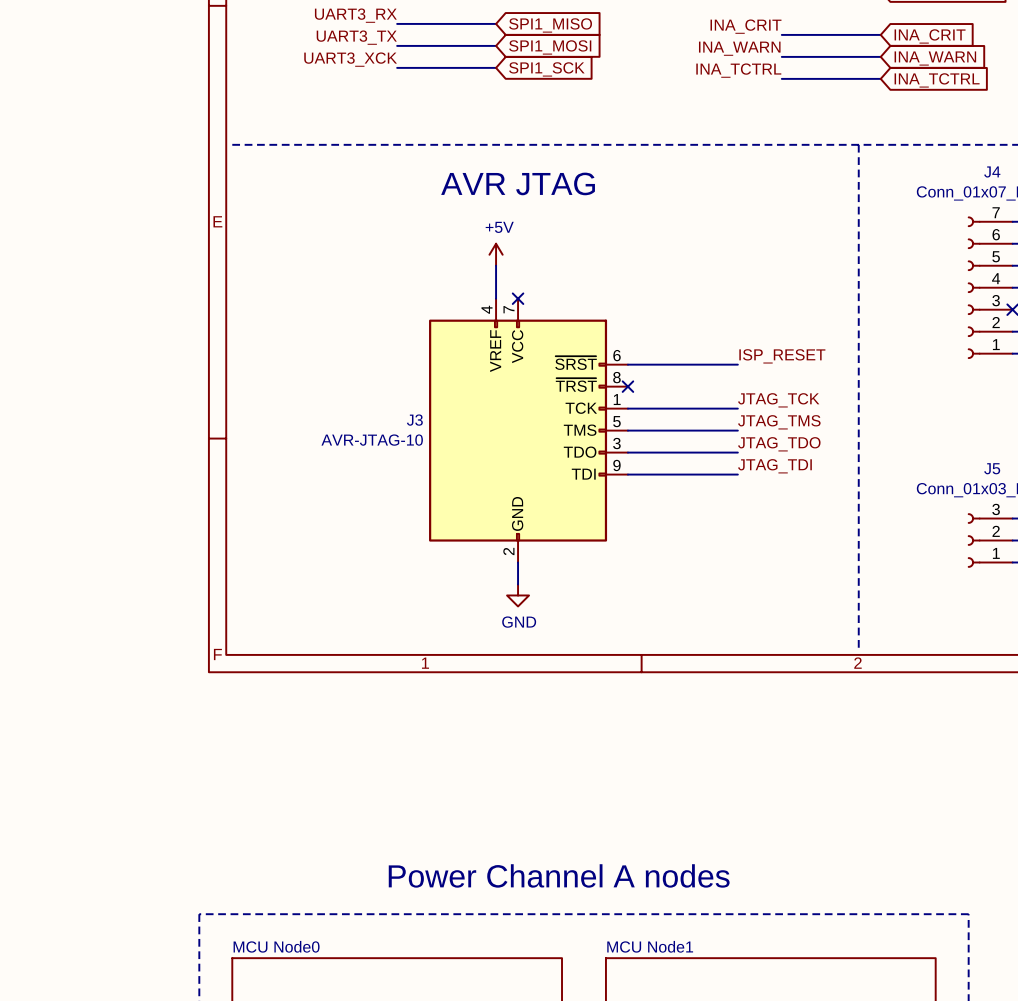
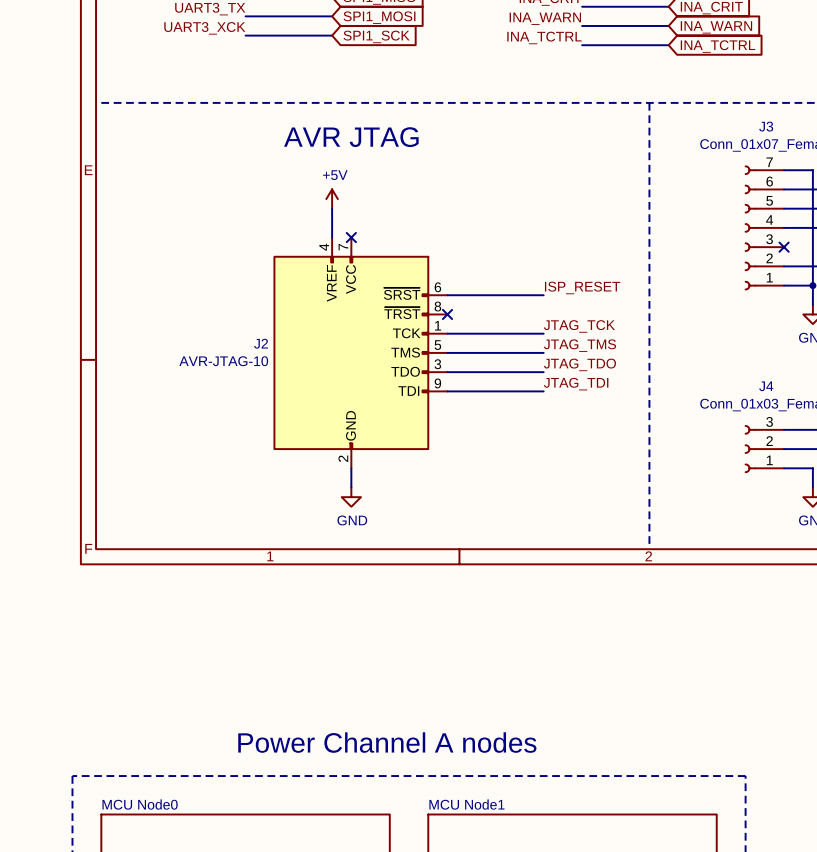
J4 name: J4 (992, 171) -> J3 (766, 126)
J3 name: J3 (414, 420) -> J2 (261, 343)
J5 name: J5 (992, 468) -> J4 (766, 386)

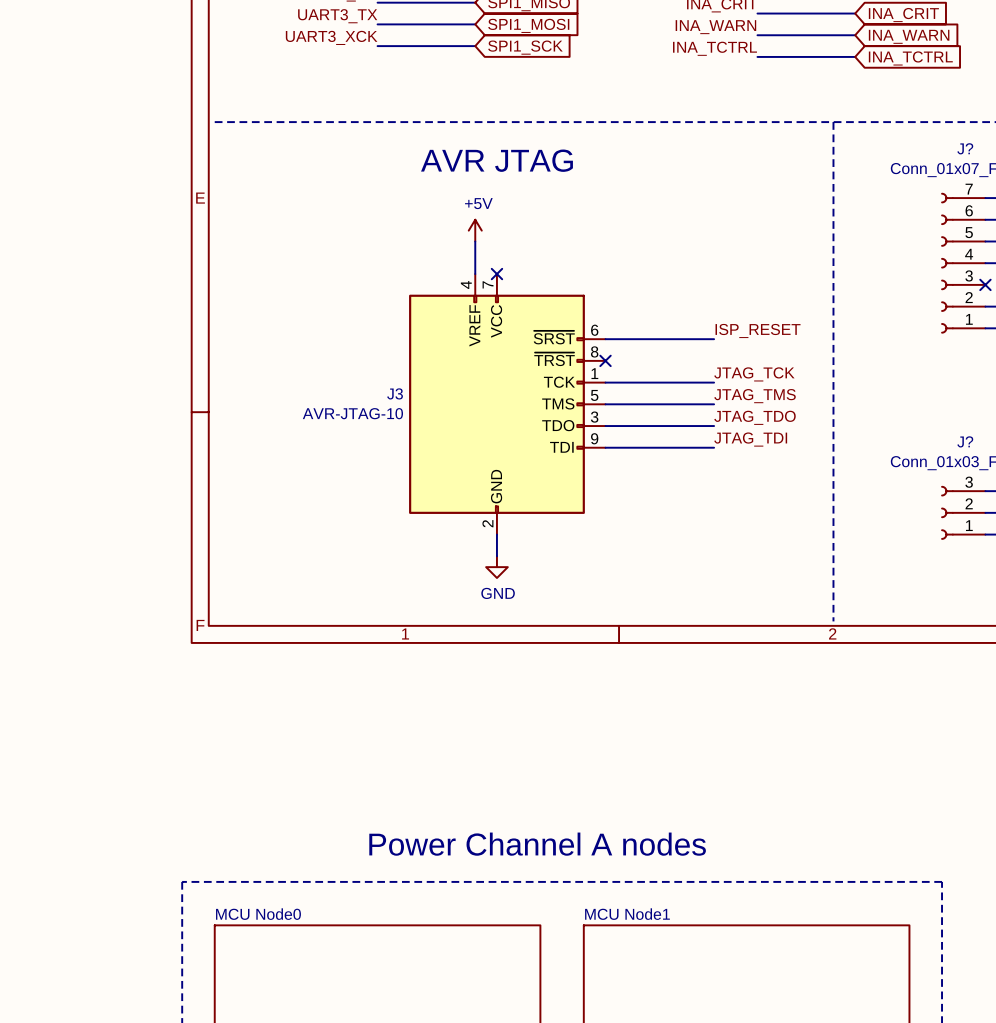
J3 name: J3 (766, 126) -> J? (965, 148)
J2 name: J2 (261, 343) -> J3 (395, 393)
J4 name: J4 (766, 386) -> J? (965, 441)

